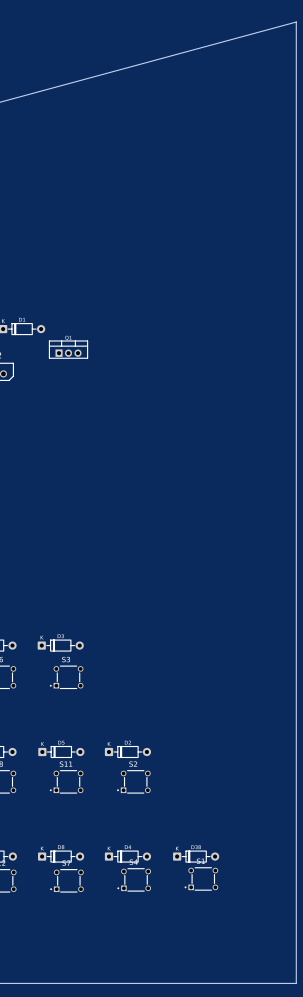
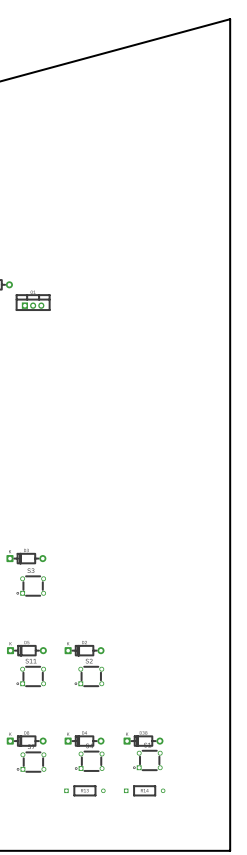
part: none -> (84, 790)
part: none -> (144, 790)

